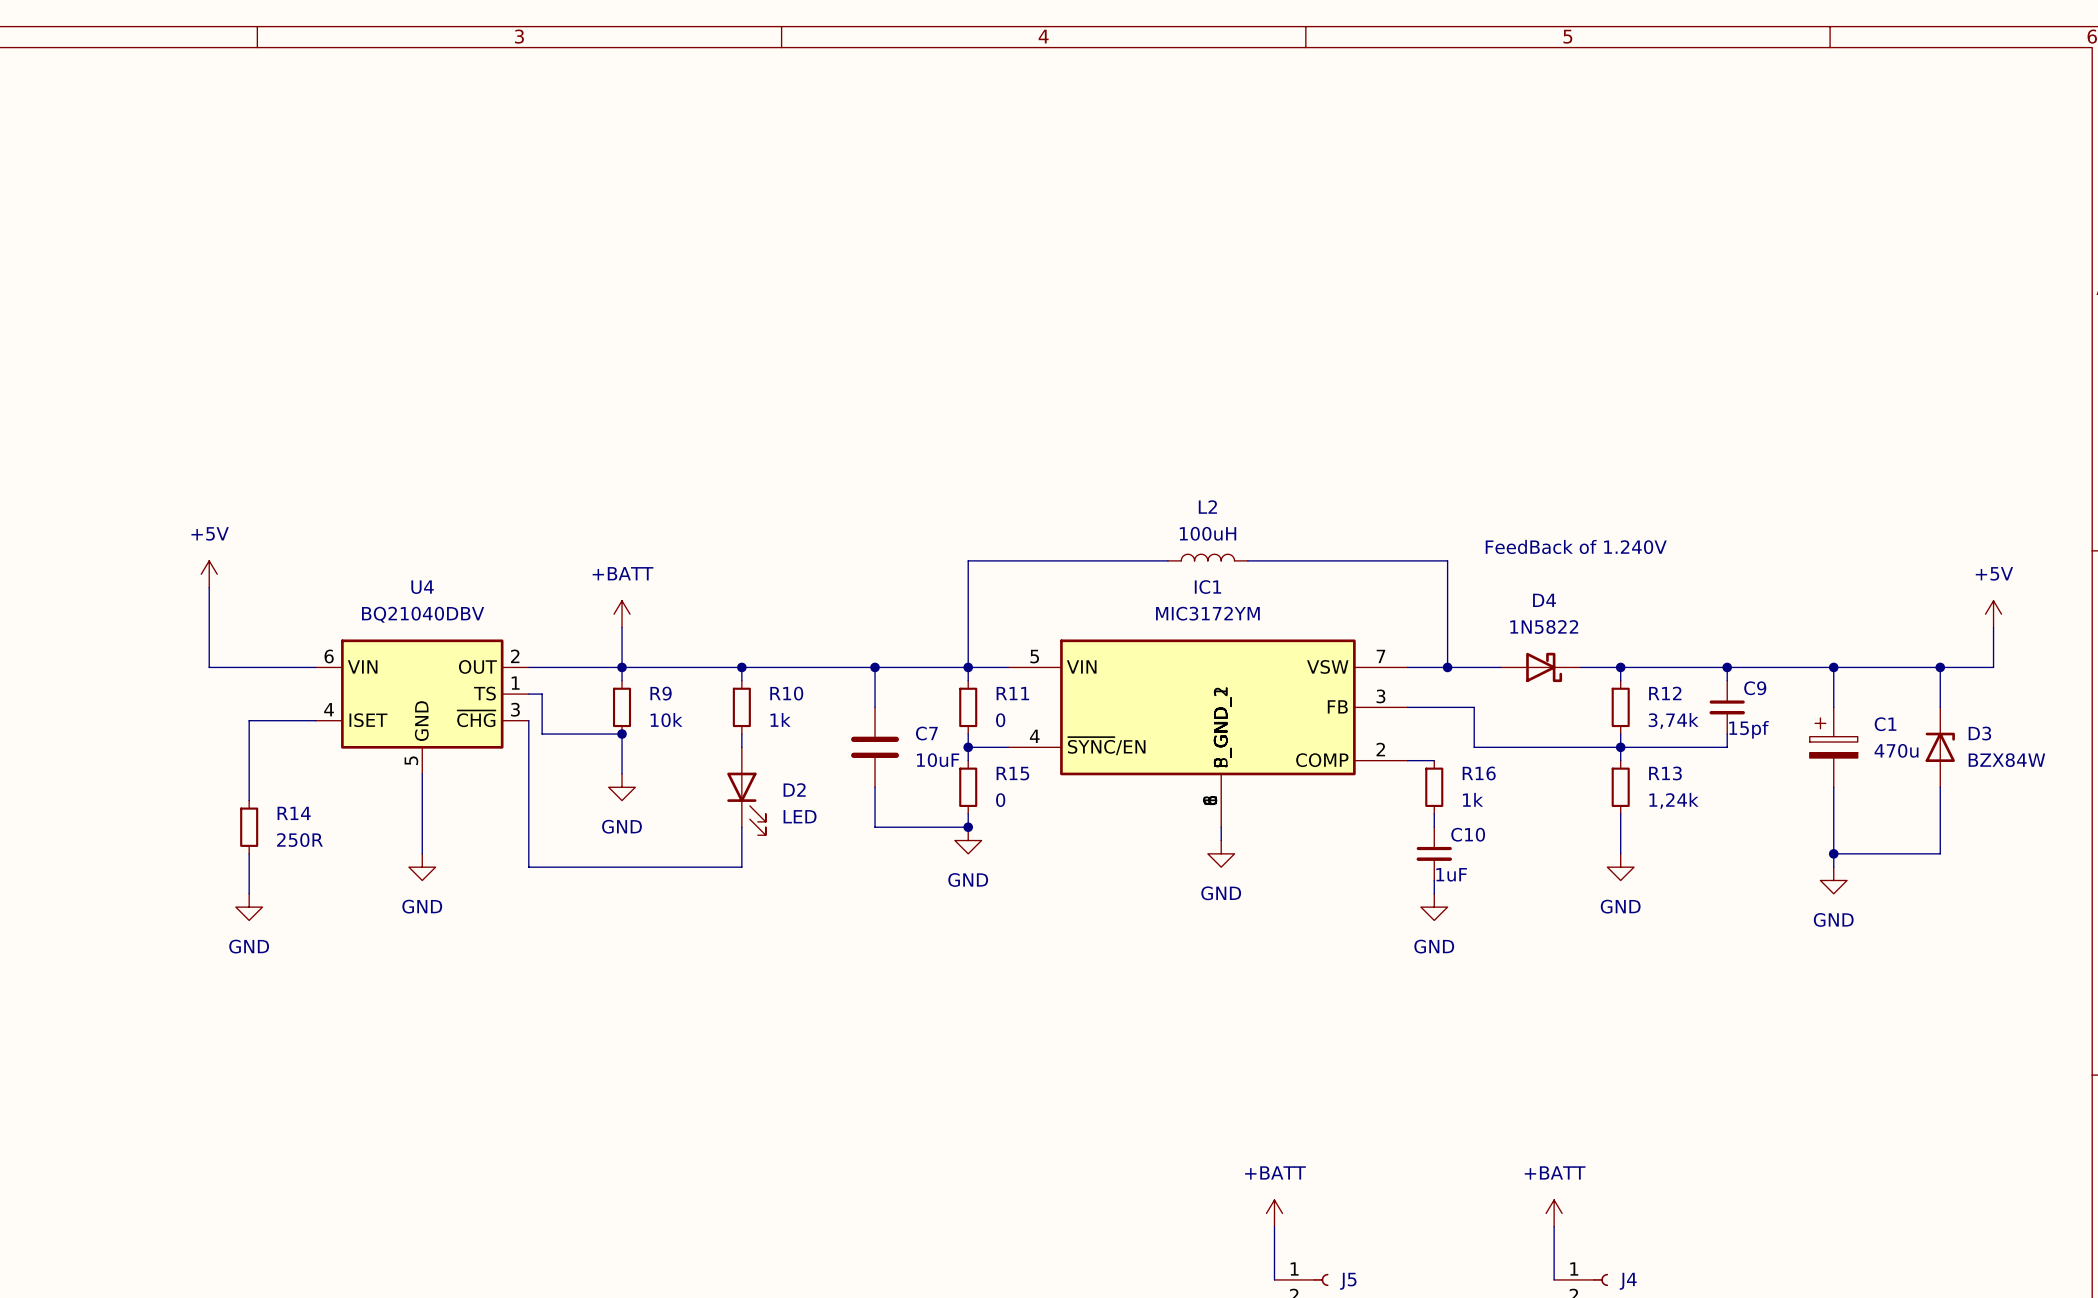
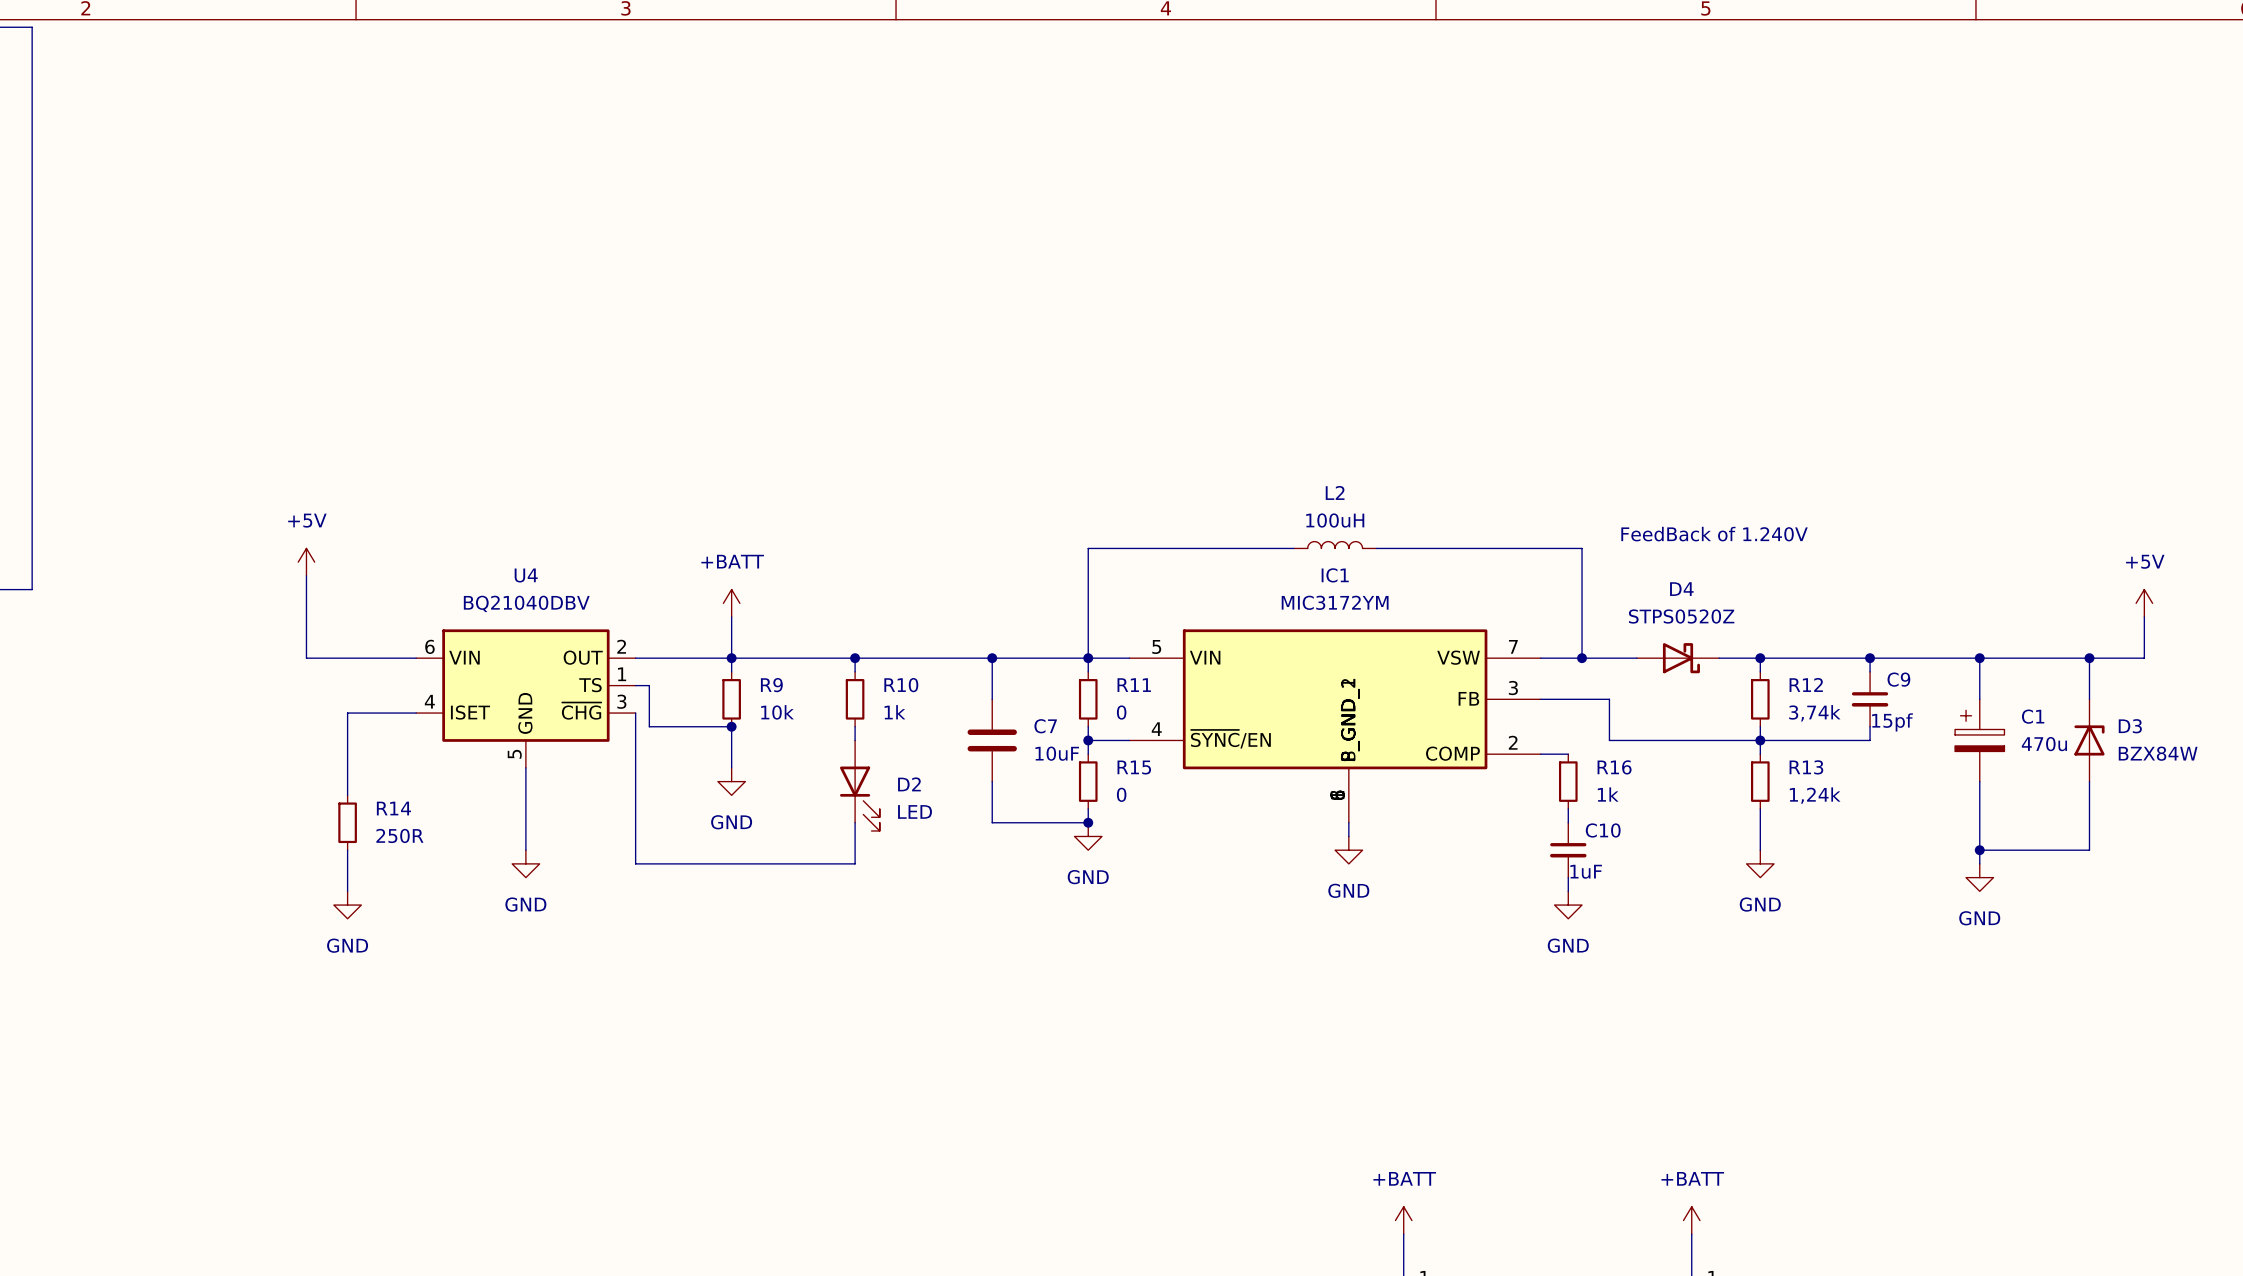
D4 value: 1N5822 (1544, 627) -> STPS0520Z (1681, 616)

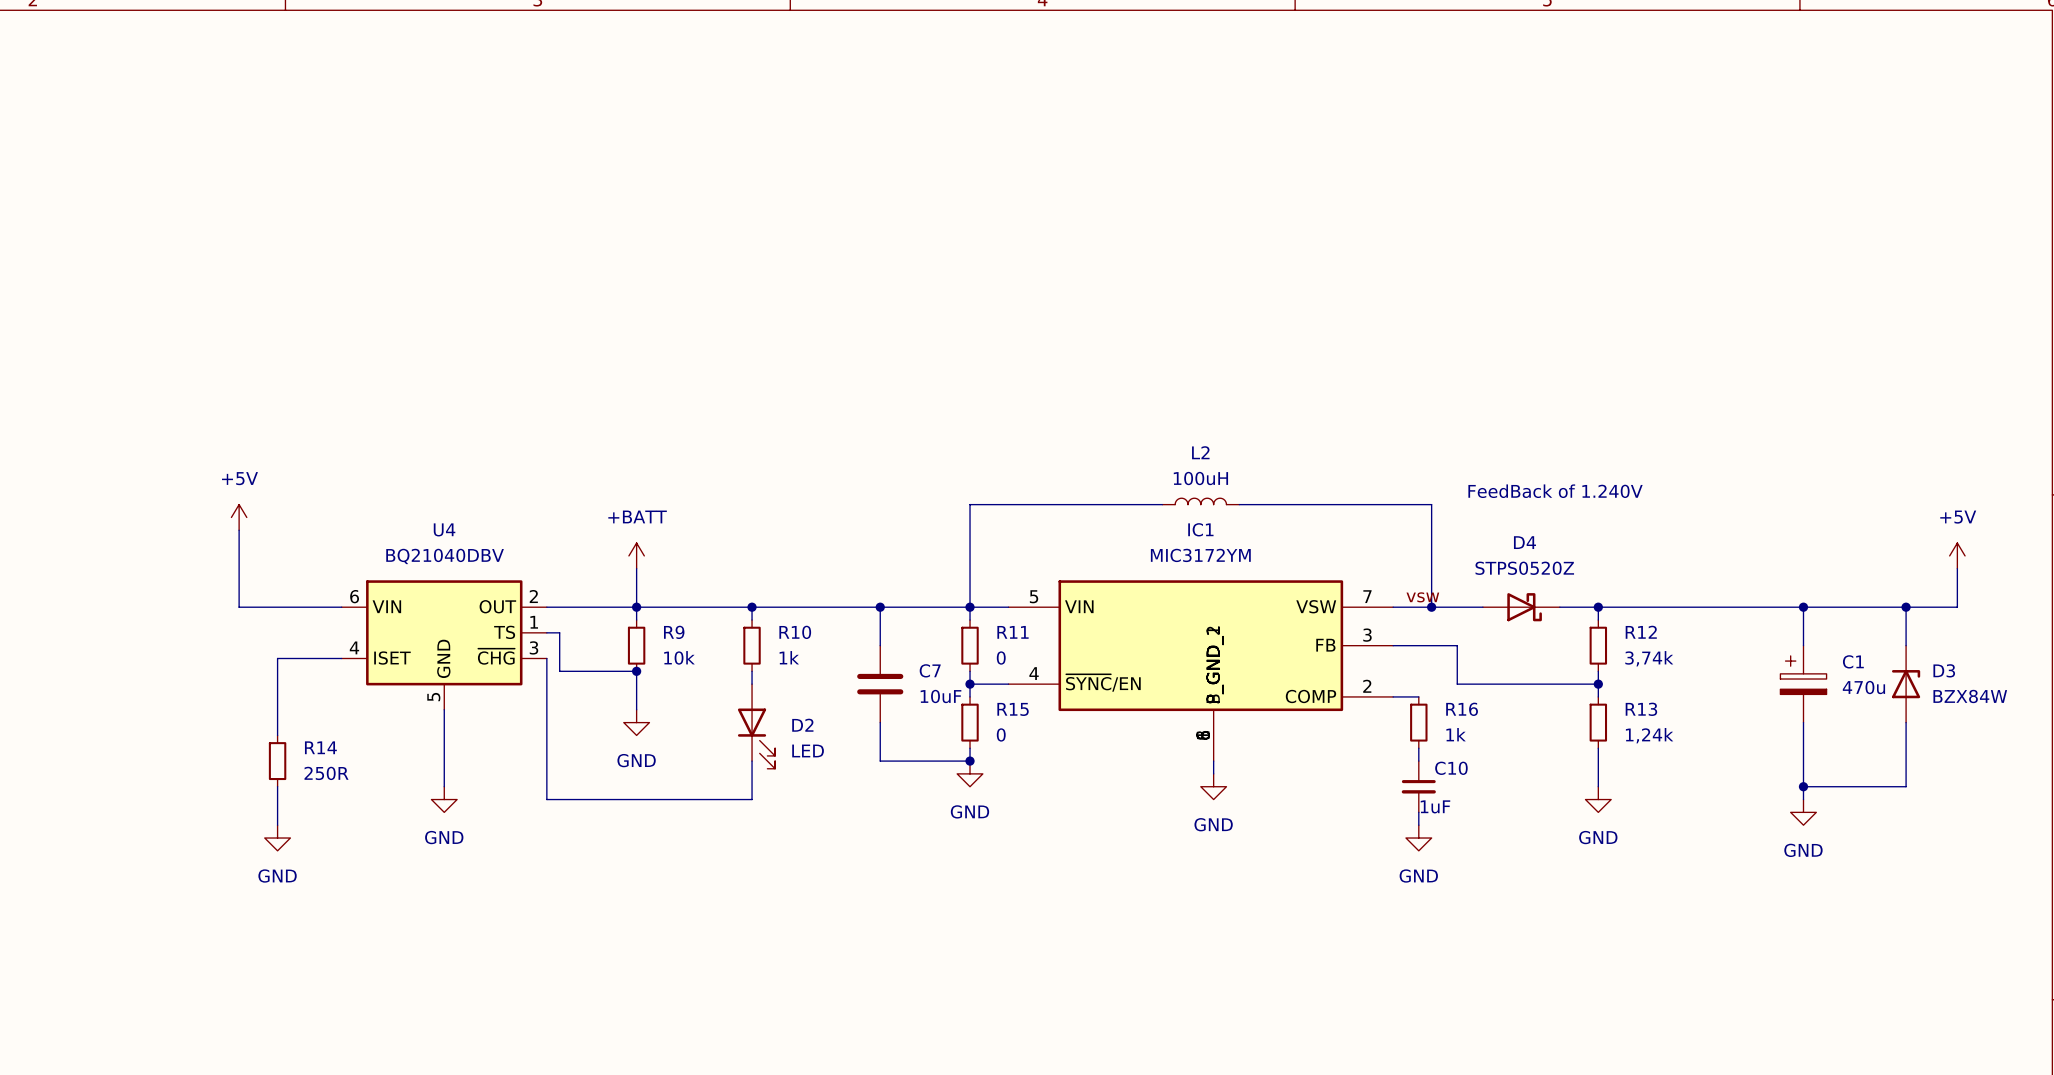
label: none -> vsw (1422, 597)
wire: (1870, 658) (1870, 671) -> none
junction: (1870, 658) -> none
C9: 15pf (1870, 699) -> none
wire: (1870, 726) (1870, 740) (1760, 740) -> none

